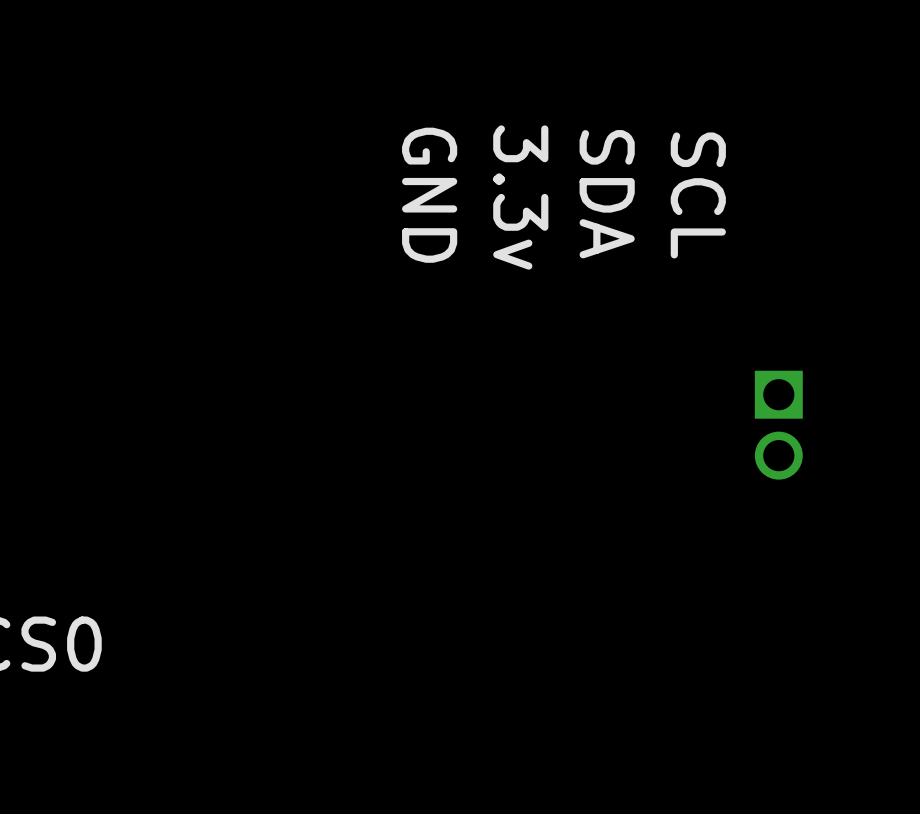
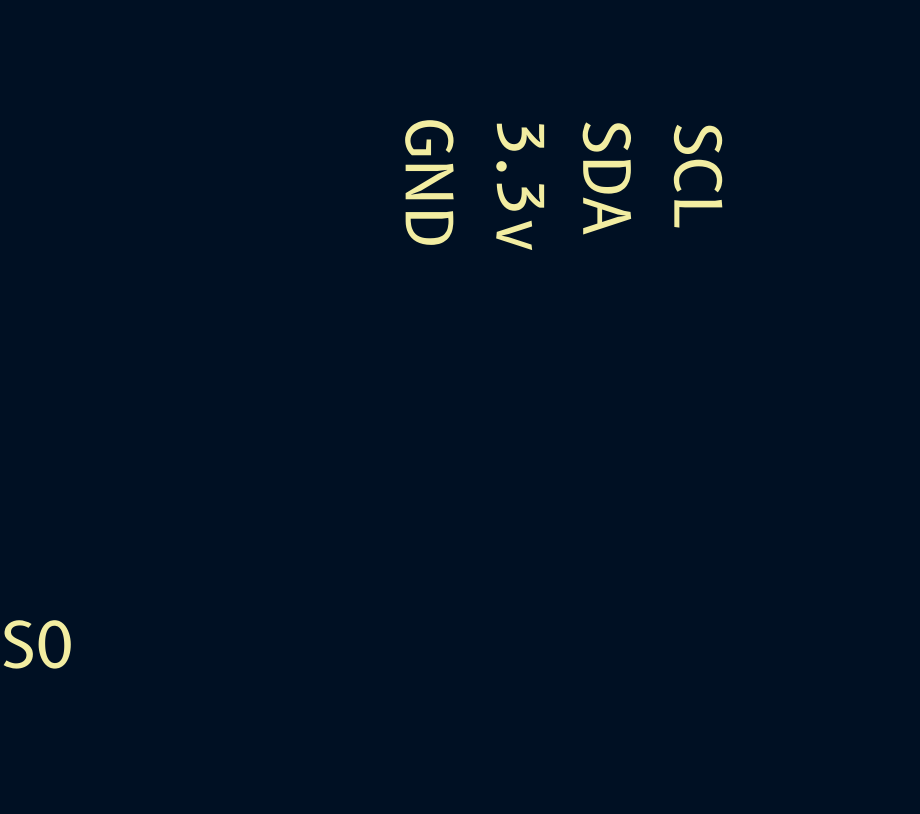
part: (778, 425) -> none

